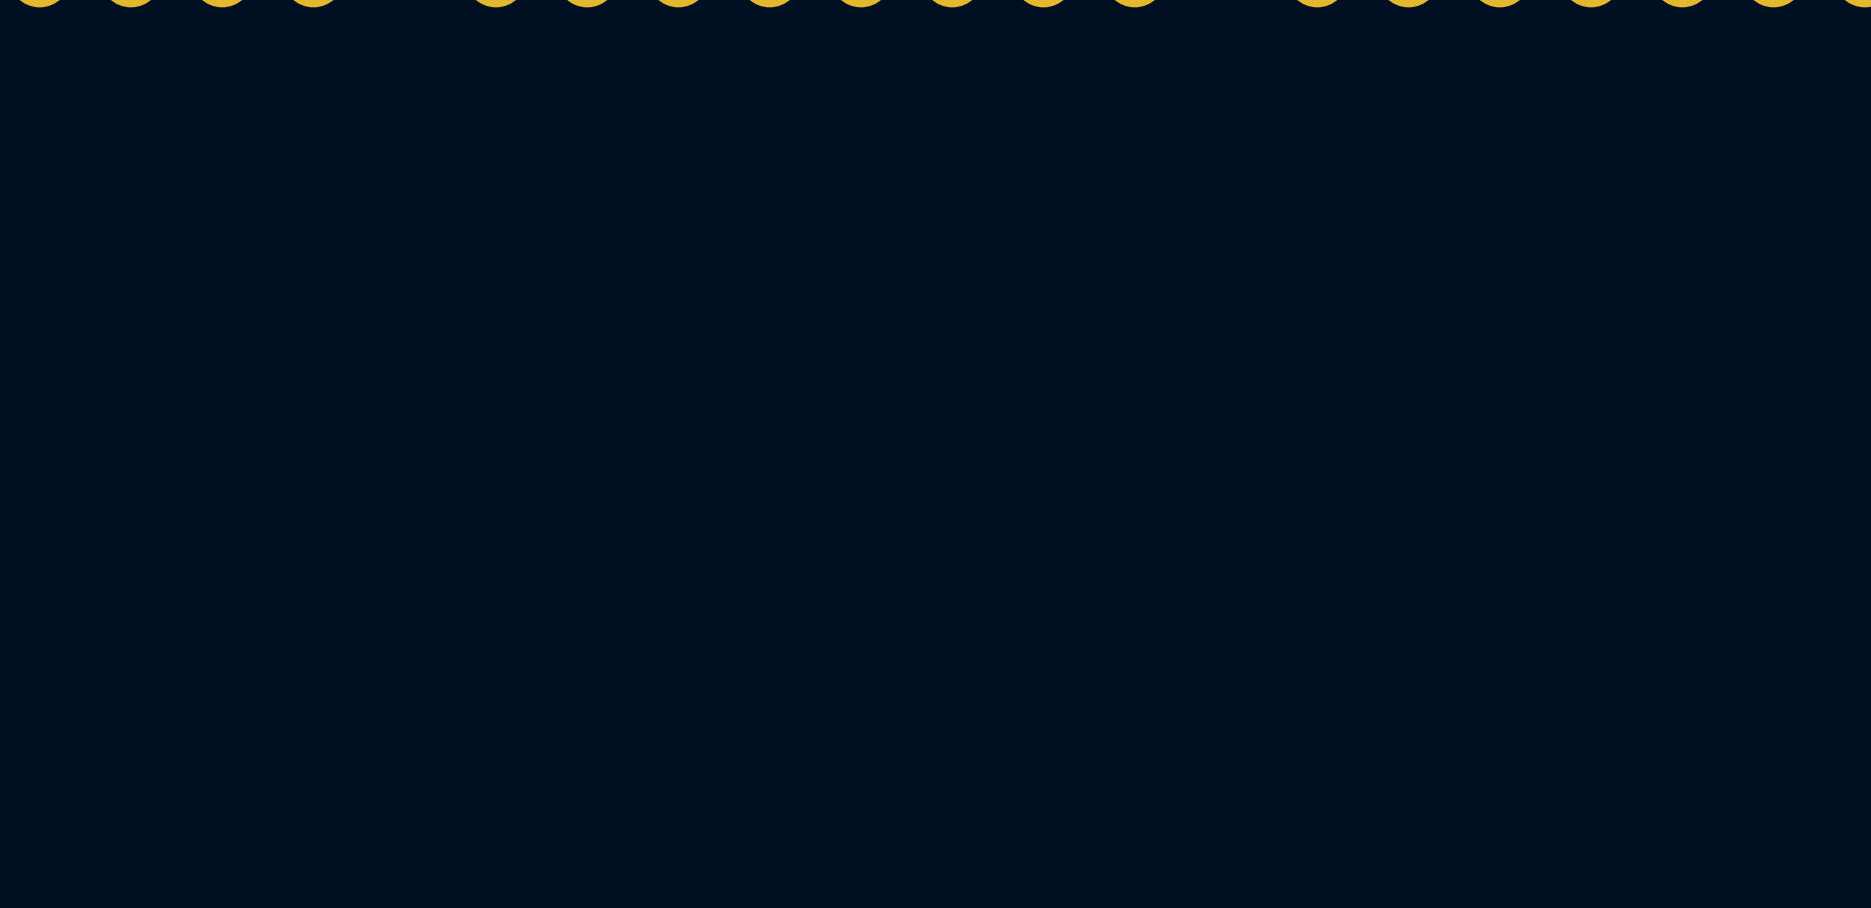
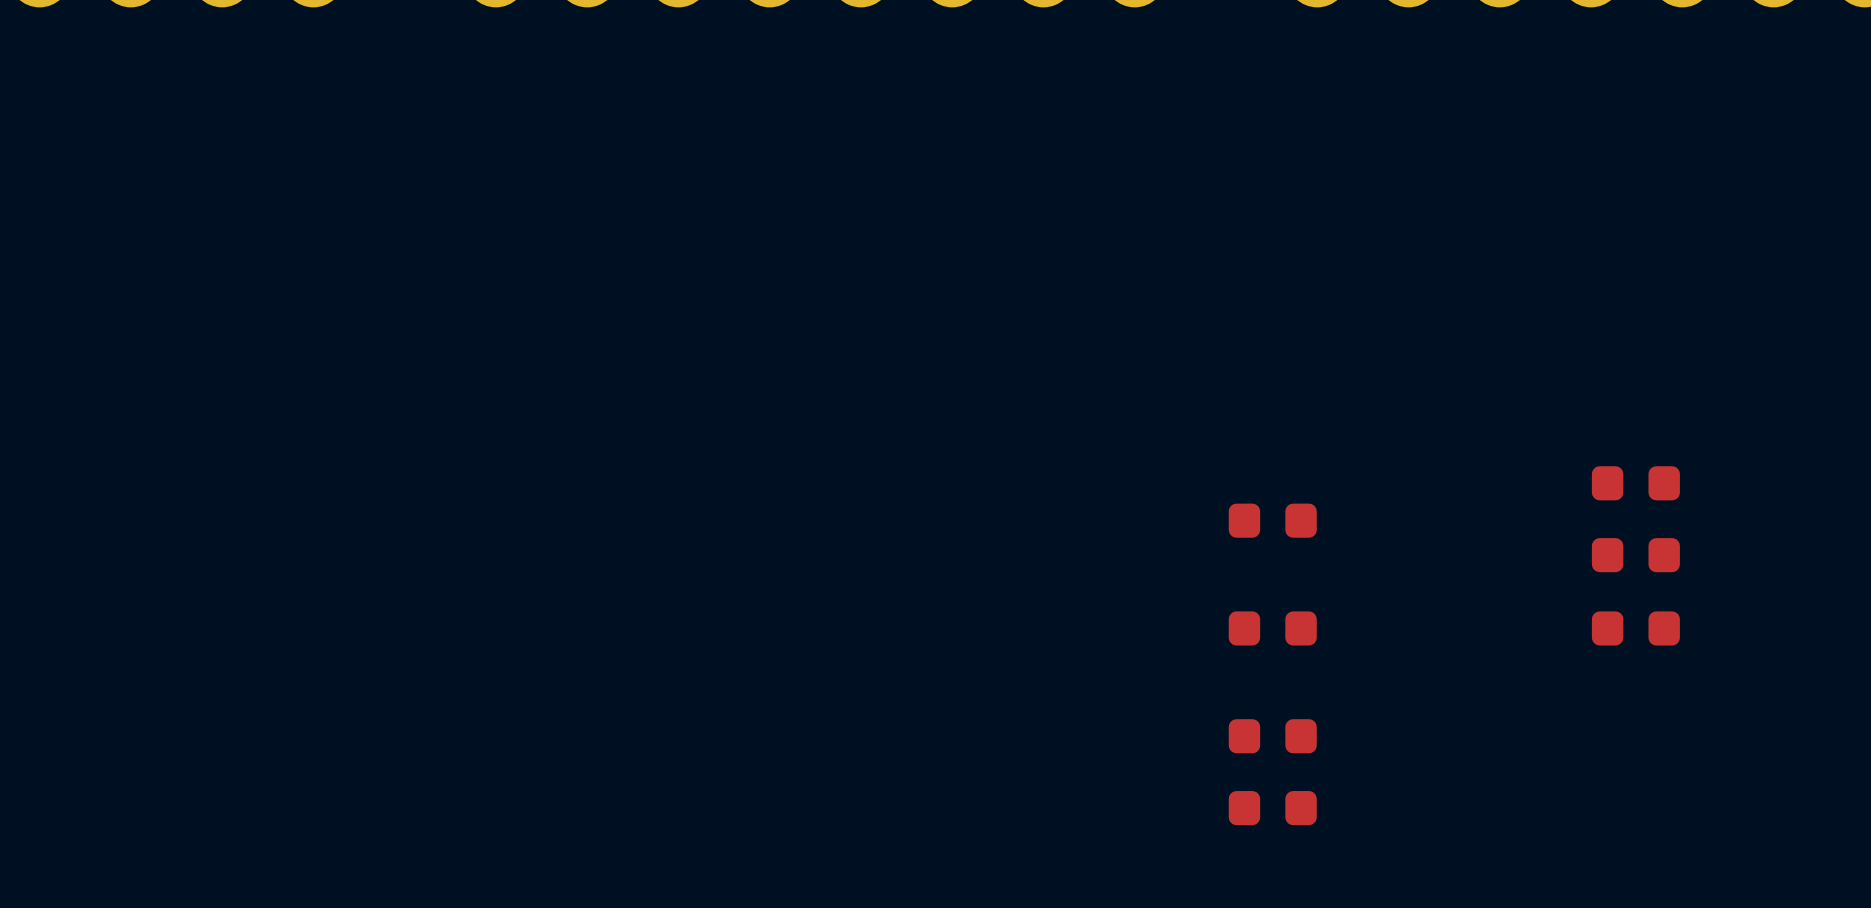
part: none -> (1635, 483)
part: none -> (1272, 520)
part: none -> (1635, 555)
part: none -> (1272, 628)
part: none -> (1635, 628)
part: none -> (1272, 736)
part: none -> (1272, 808)

